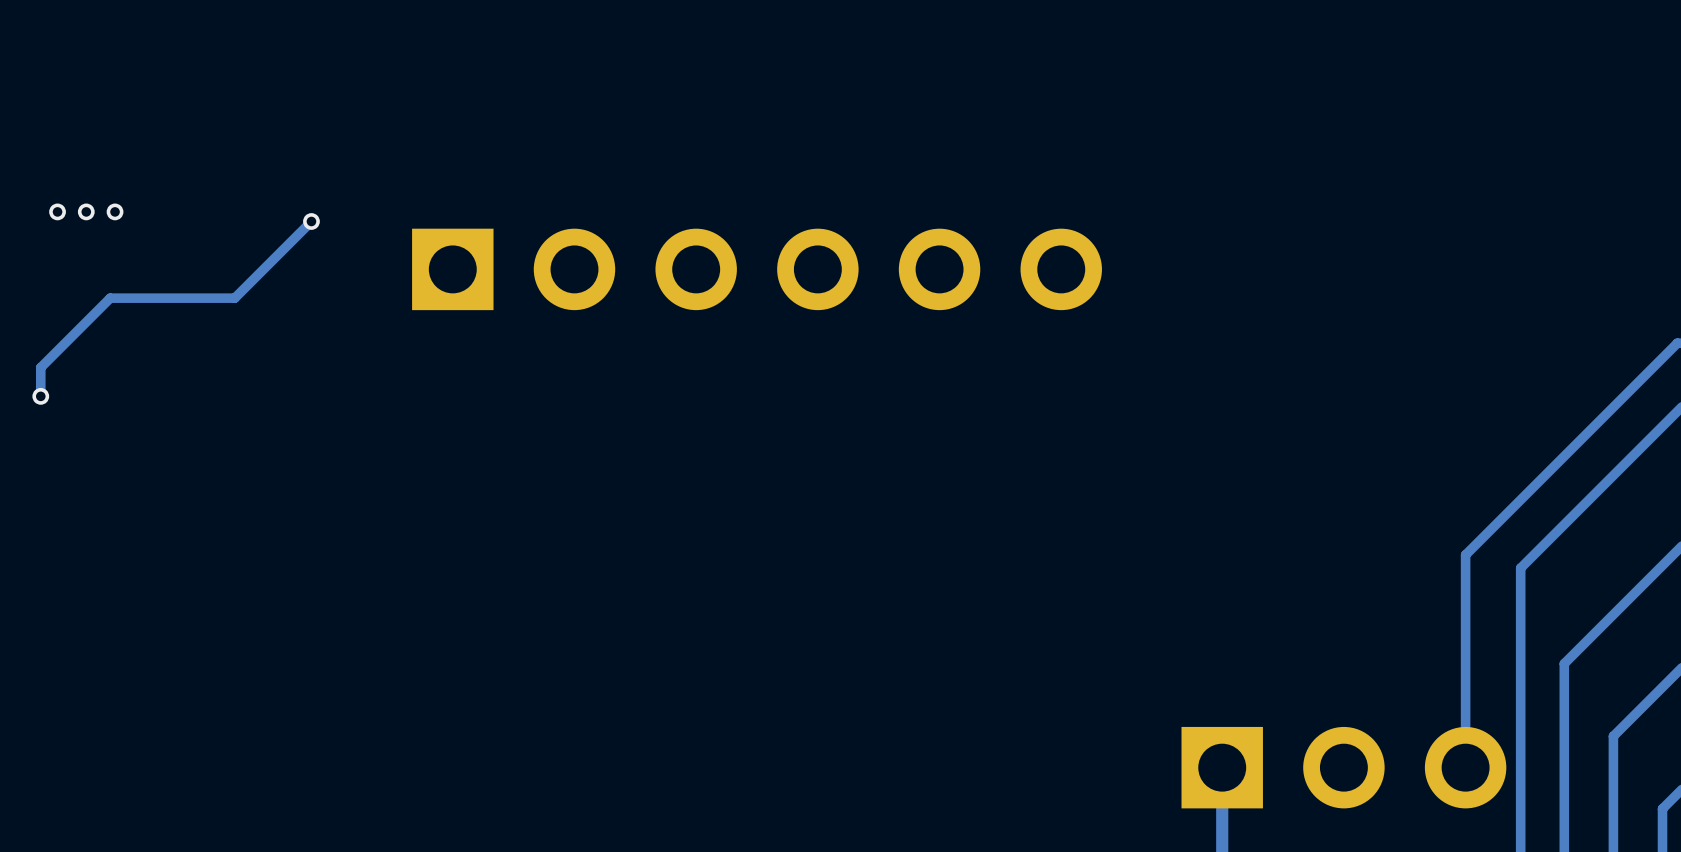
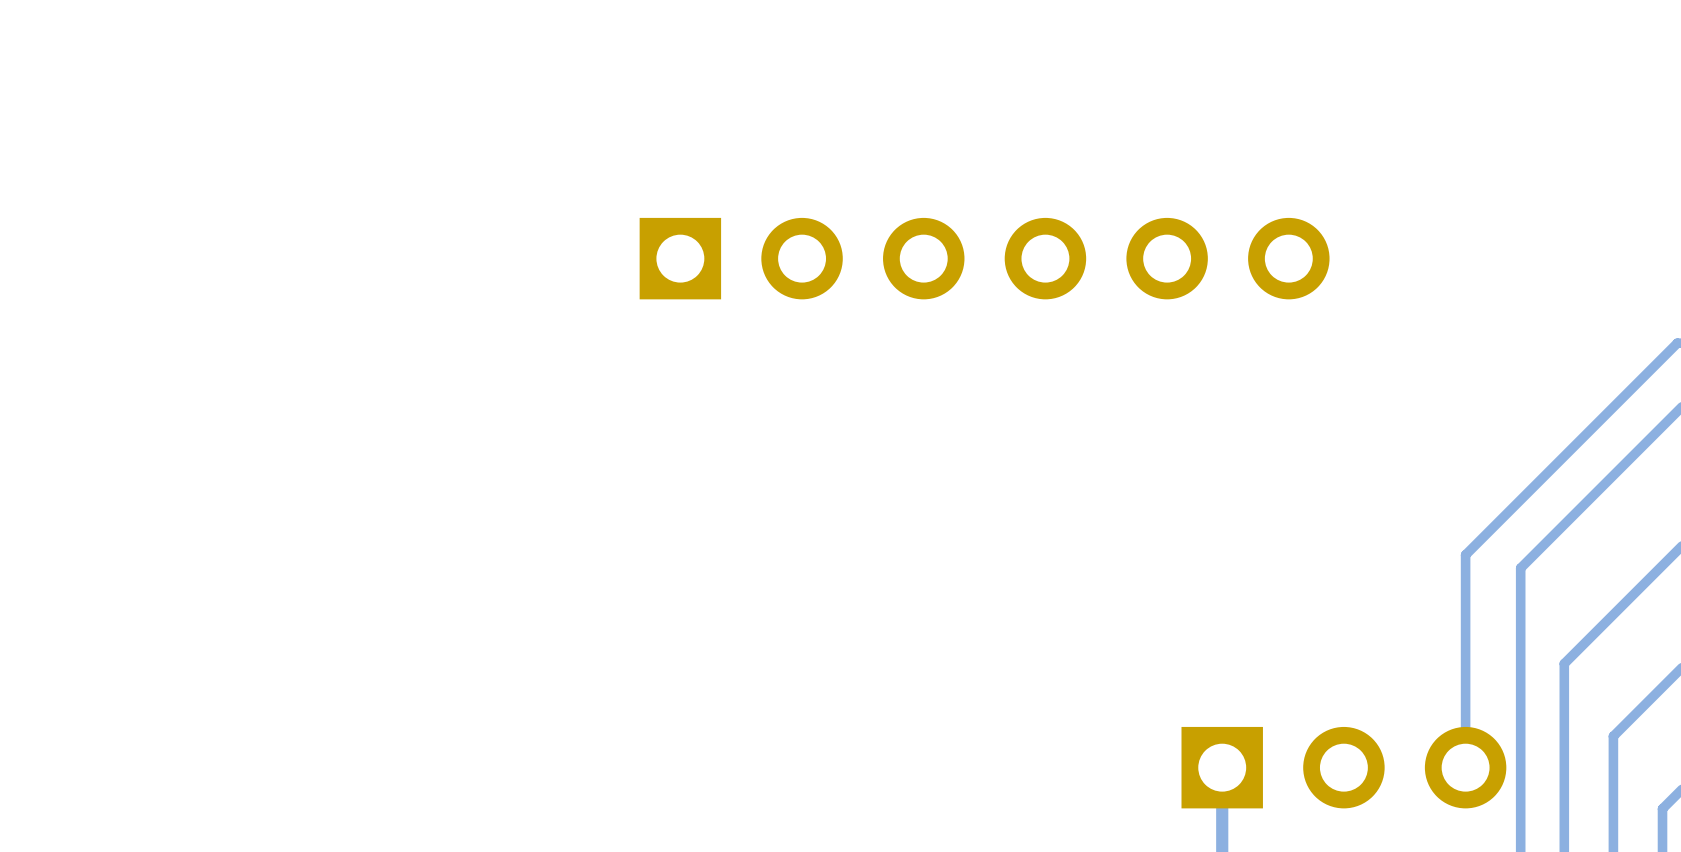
via: (57, 211) -> none
via: (86, 211) -> none
via: (115, 211) -> none
track: (311, 221) (234, 298) (110, 298) (40, 367) (40, 396) -> none
via: (311, 221) -> none
part position: (757, 269) -> (984, 258)
via: (40, 396) -> none

